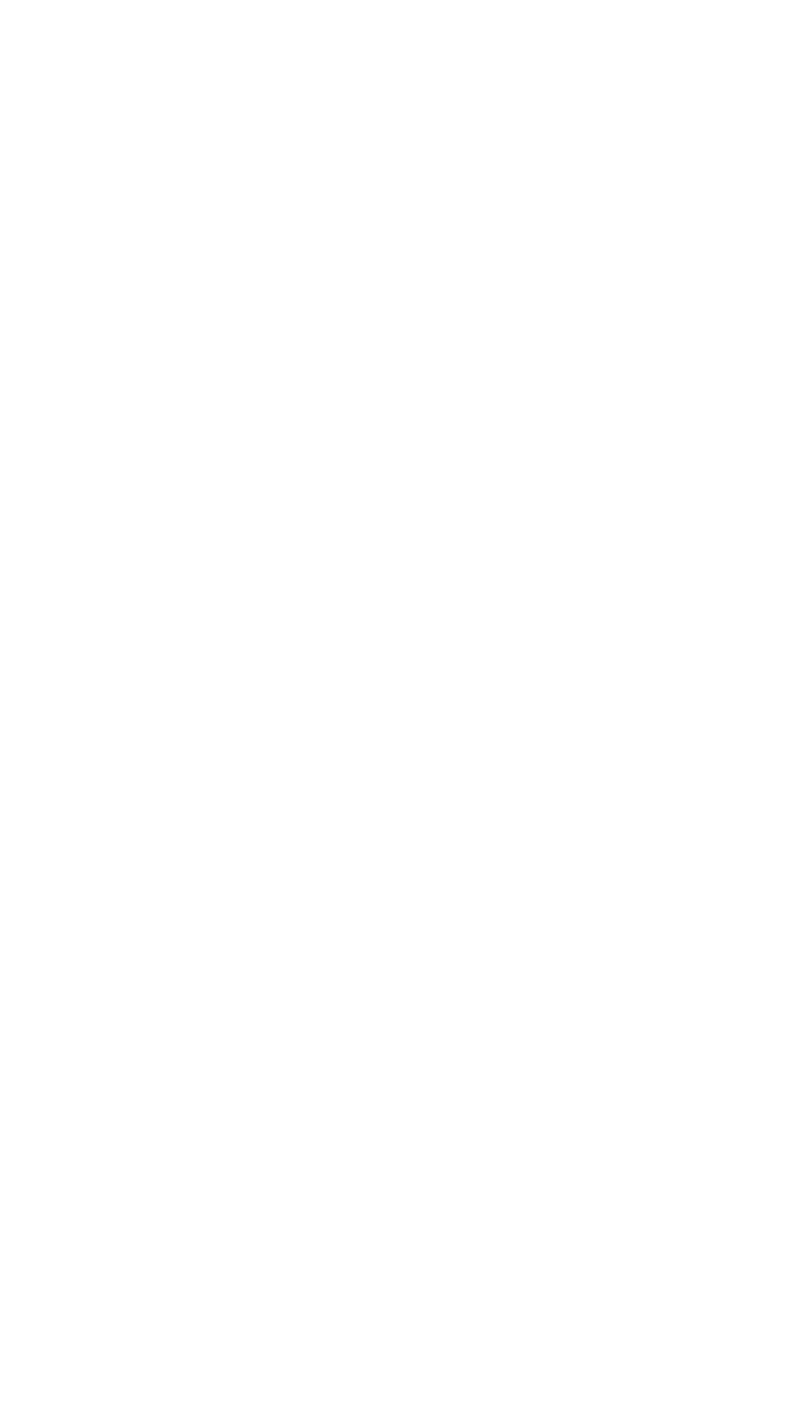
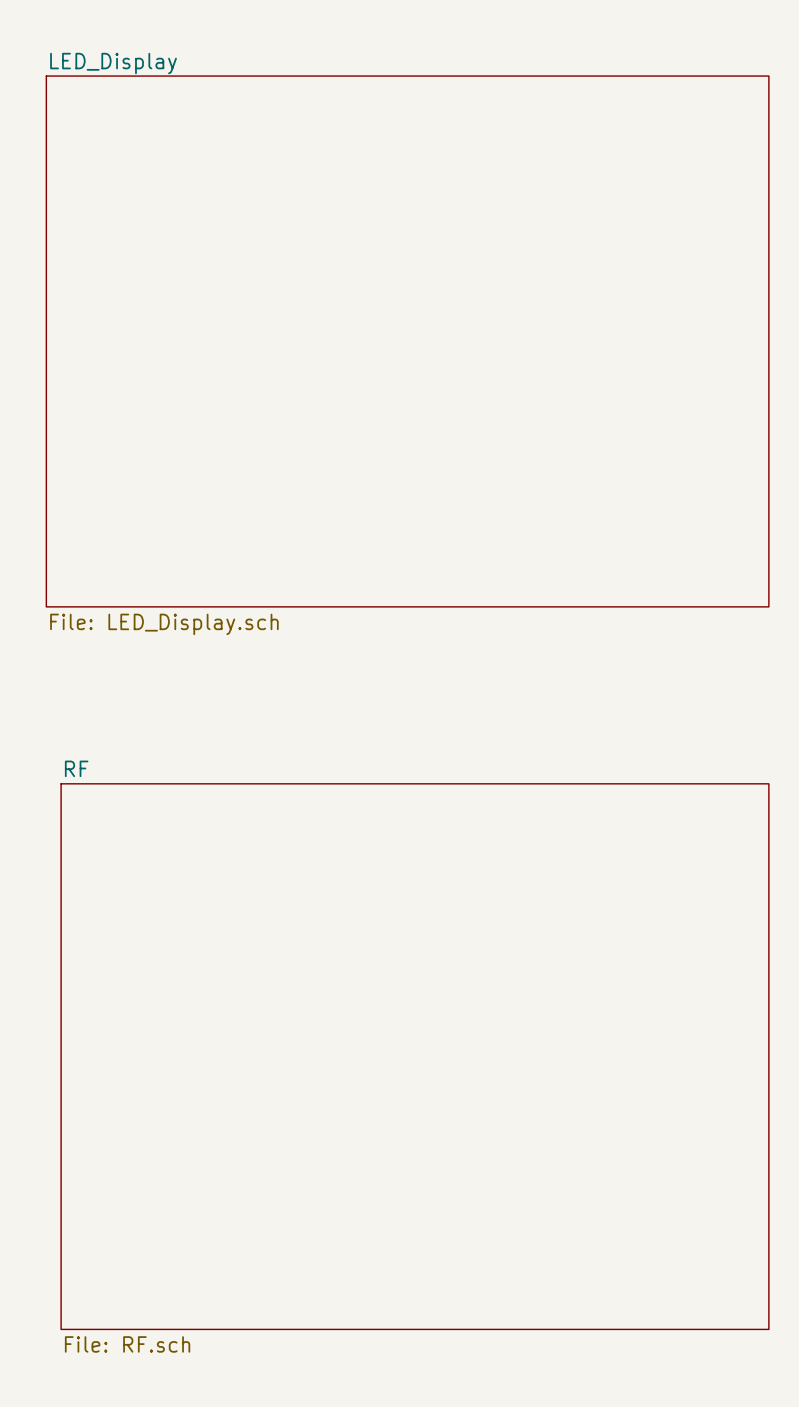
sheet LED_Display: none -> File: LED_Display.sch (407, 341)
sheet RF: none -> File: RF.sch (414, 1056)

